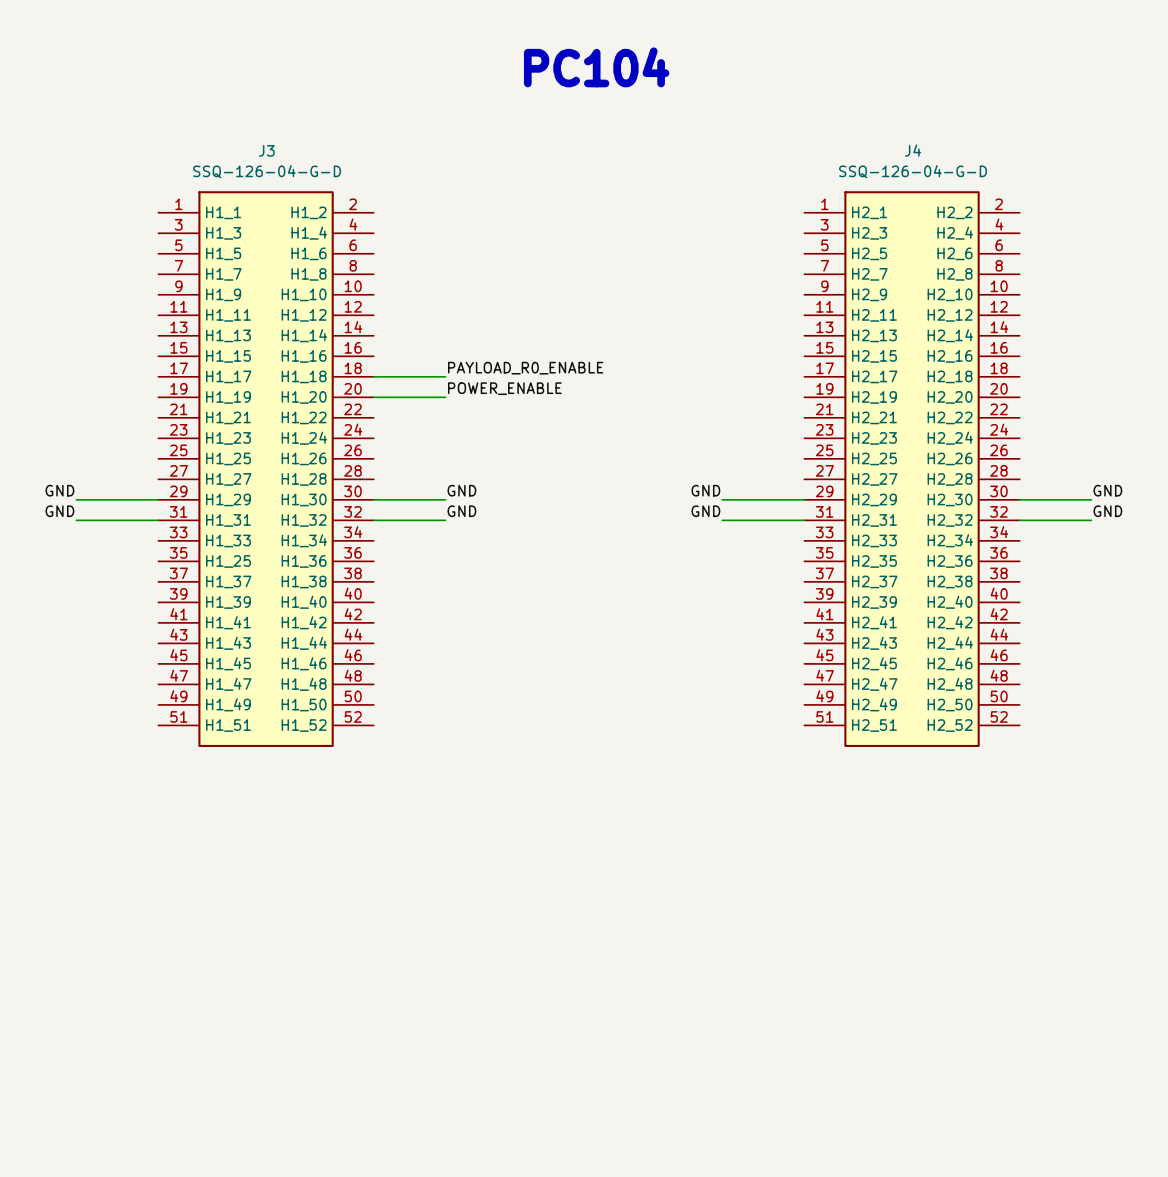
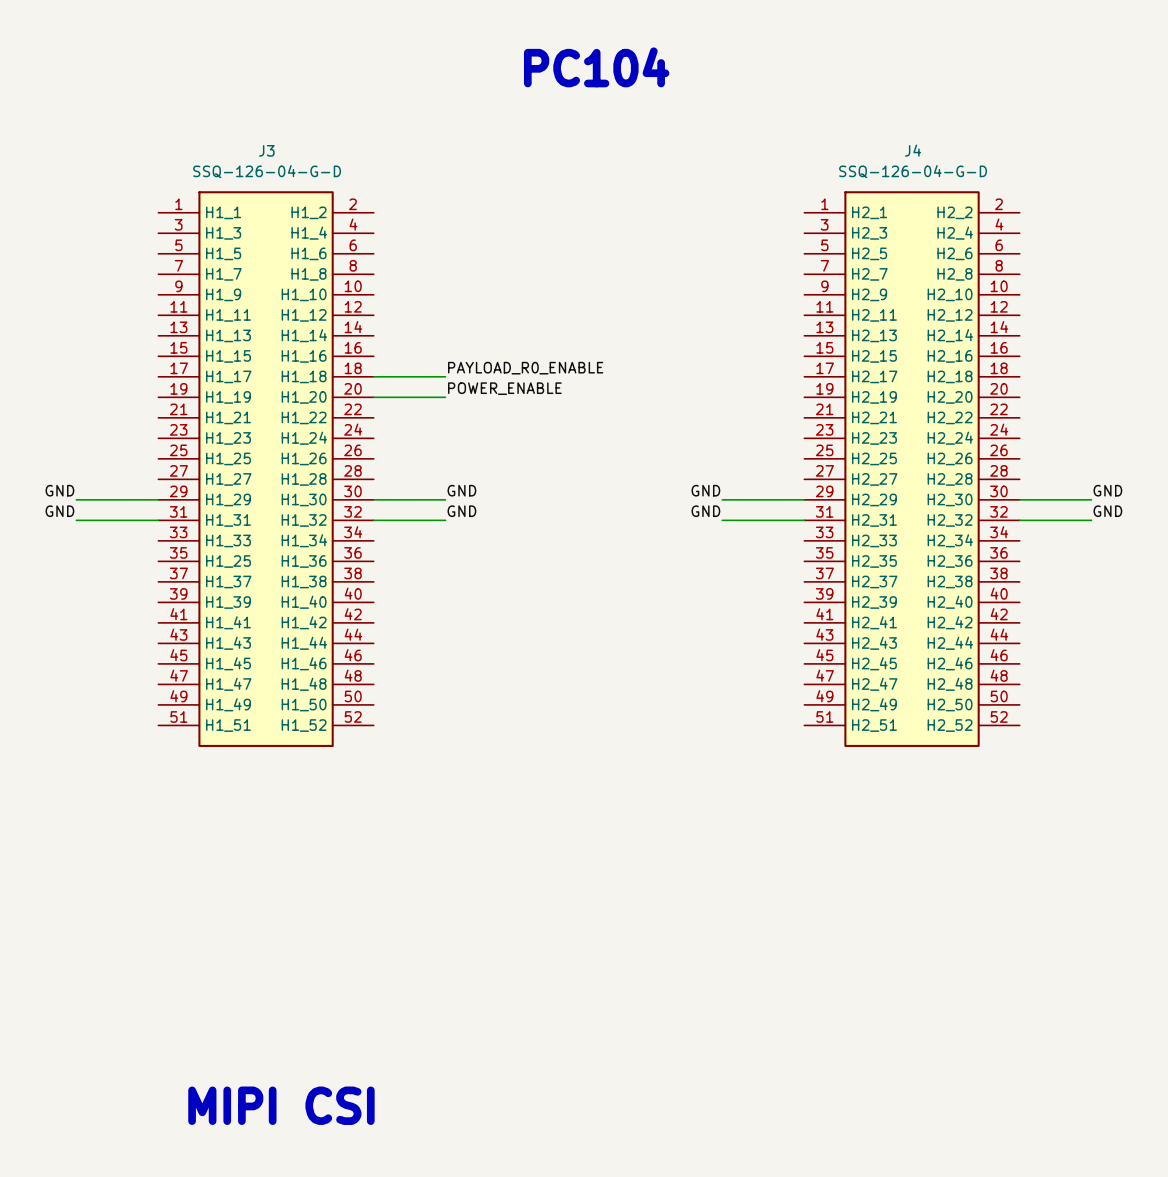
text: none -> MIPI CSI (281, 1105)

